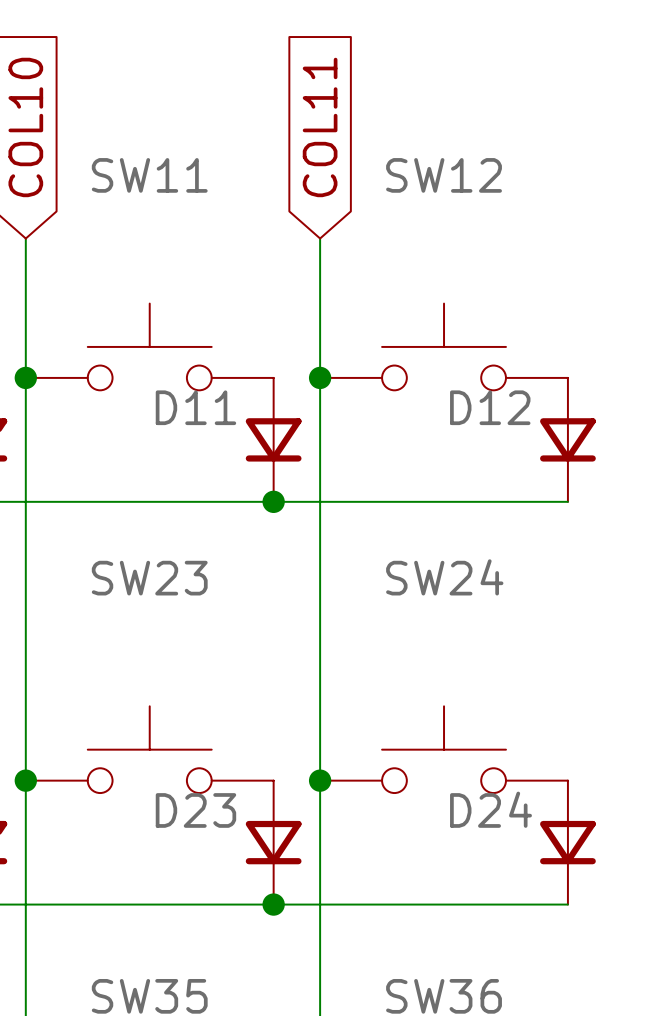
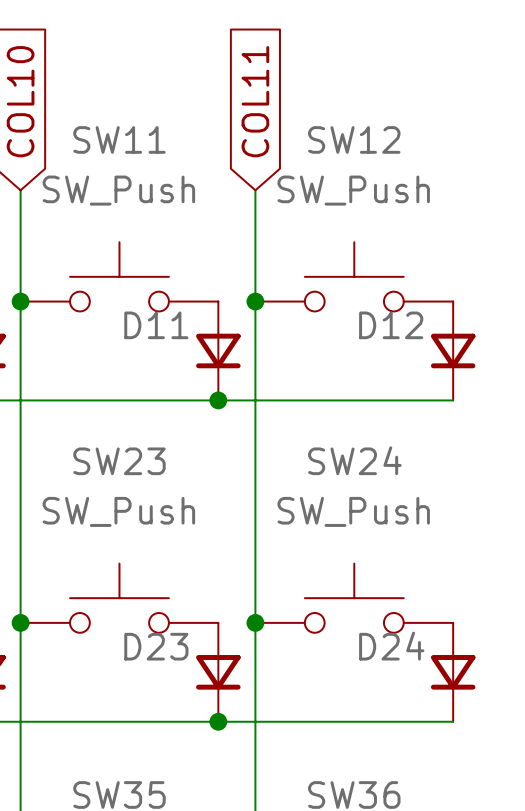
SW11 value: none -> SW_Push (118, 190)
SW12 value: none -> SW_Push (353, 190)
SW23 value: none -> SW_Push (118, 511)
SW24 value: none -> SW_Push (353, 511)

